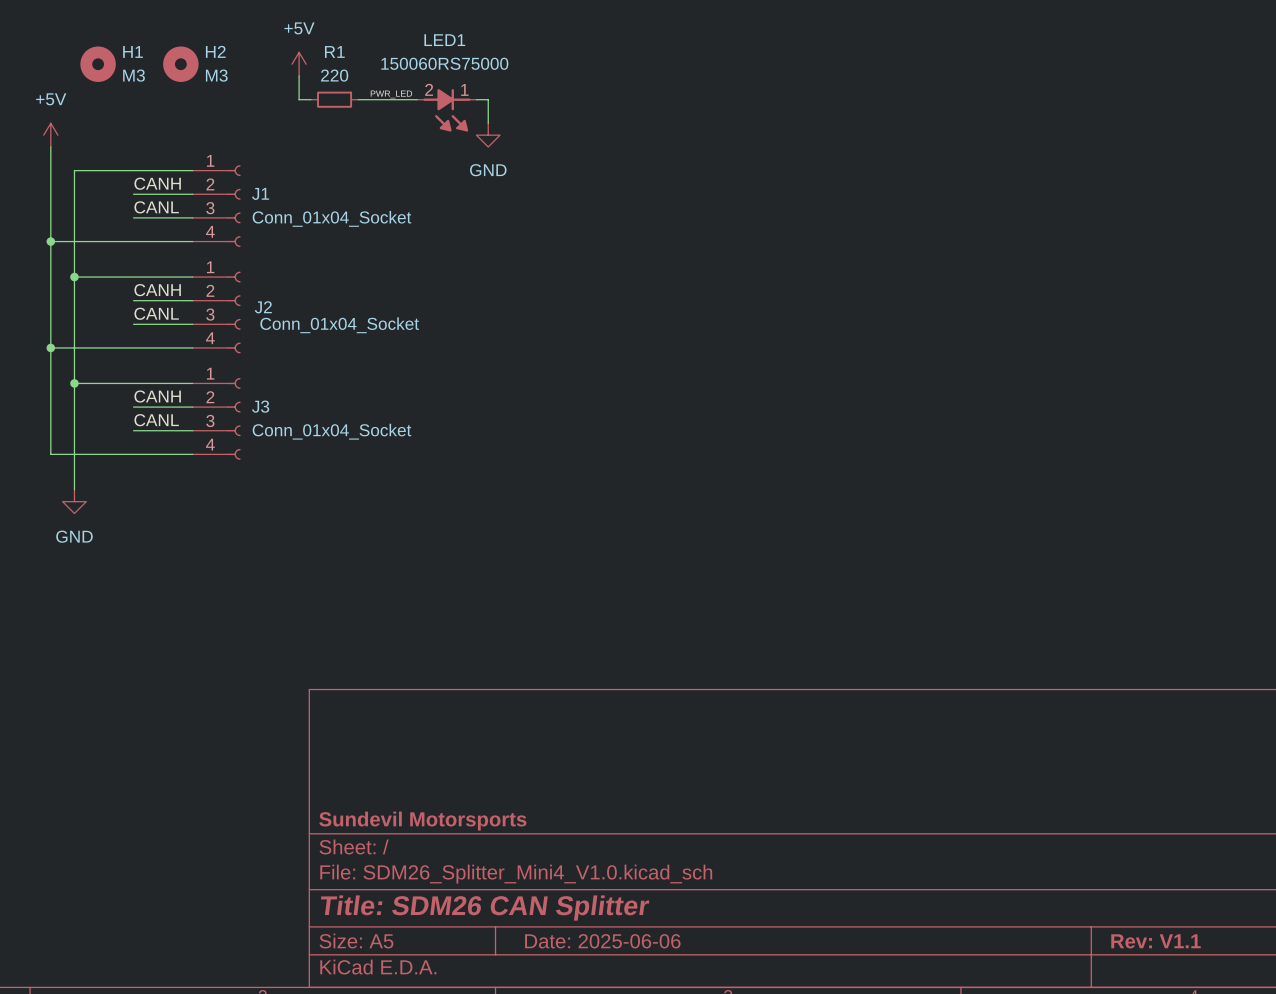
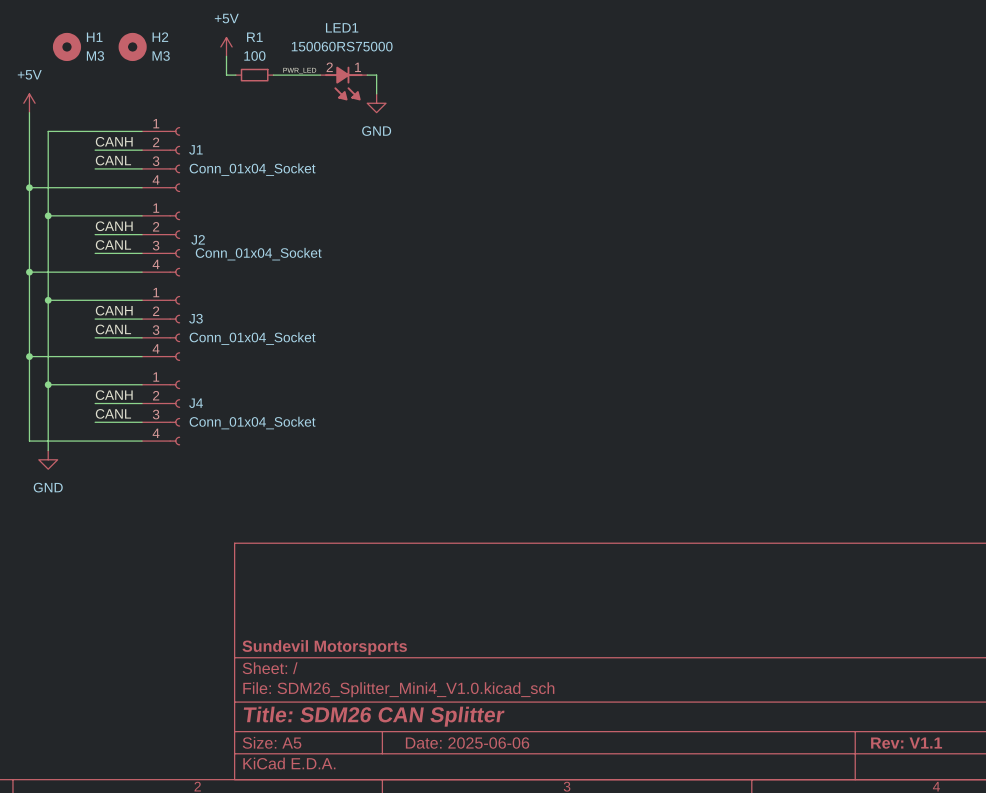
R1 value: 220 (334, 75) -> 100 (254, 55)
wire: none -> (29, 356) (29, 441) (142, 441)
junction: none -> (29, 356)
junction: none -> (48, 384)
wire: none -> (142, 384) (48, 384) (48, 450)
power symbol position: GND (74, 501) -> GND (48, 459)
label: none -> CANH (114, 395)
wire: none -> (95, 403) (142, 403)
J4: none -> Conn_01x04_Socket (161, 412)
label: none -> CANL (113, 413)
wire: none -> (95, 422) (142, 422)

